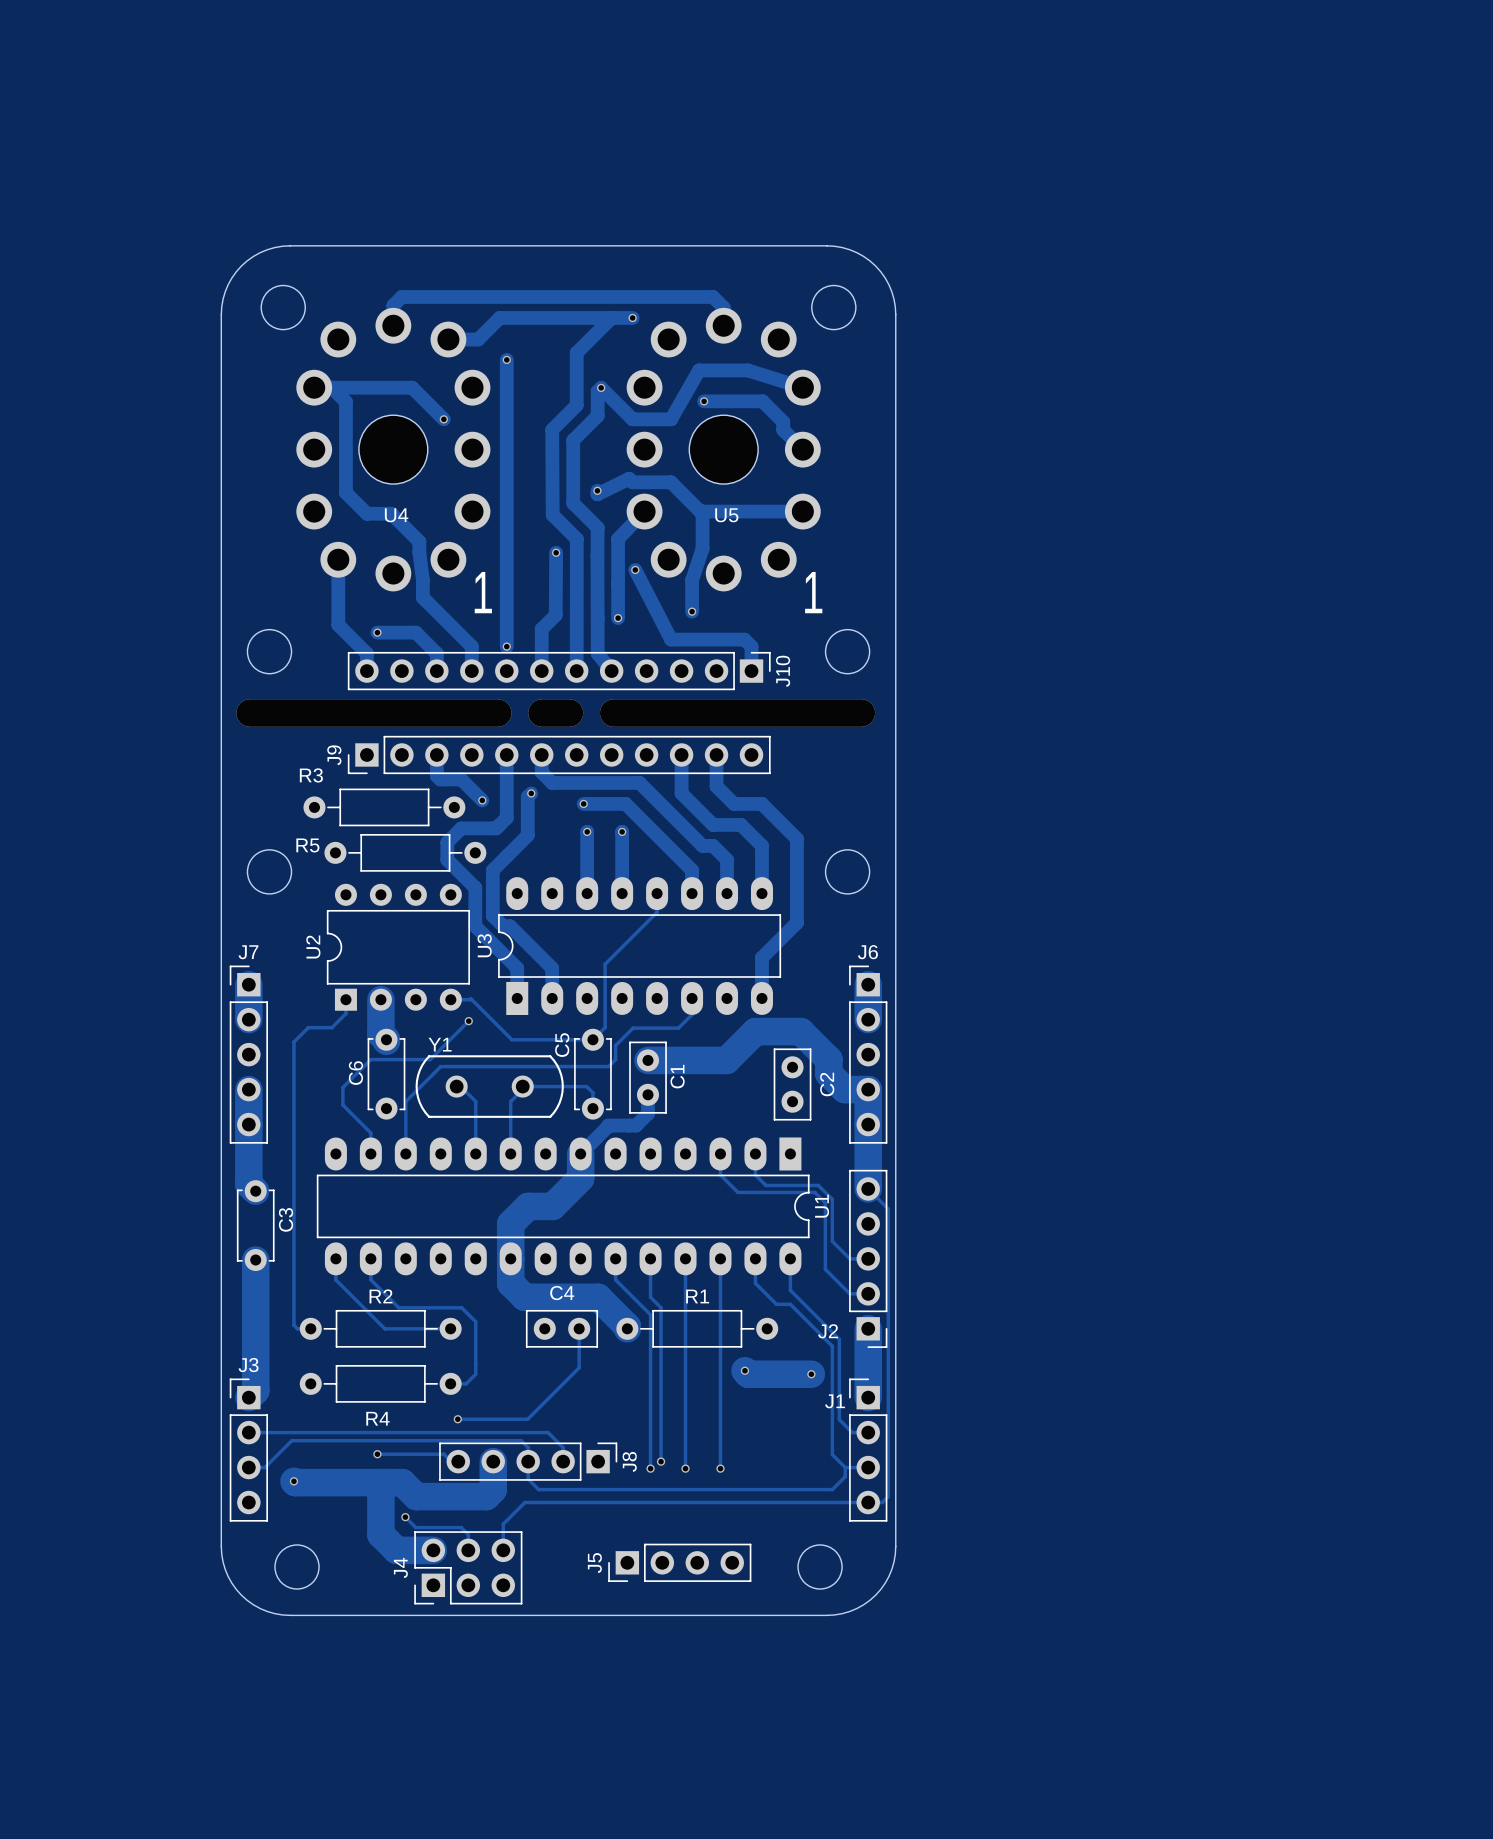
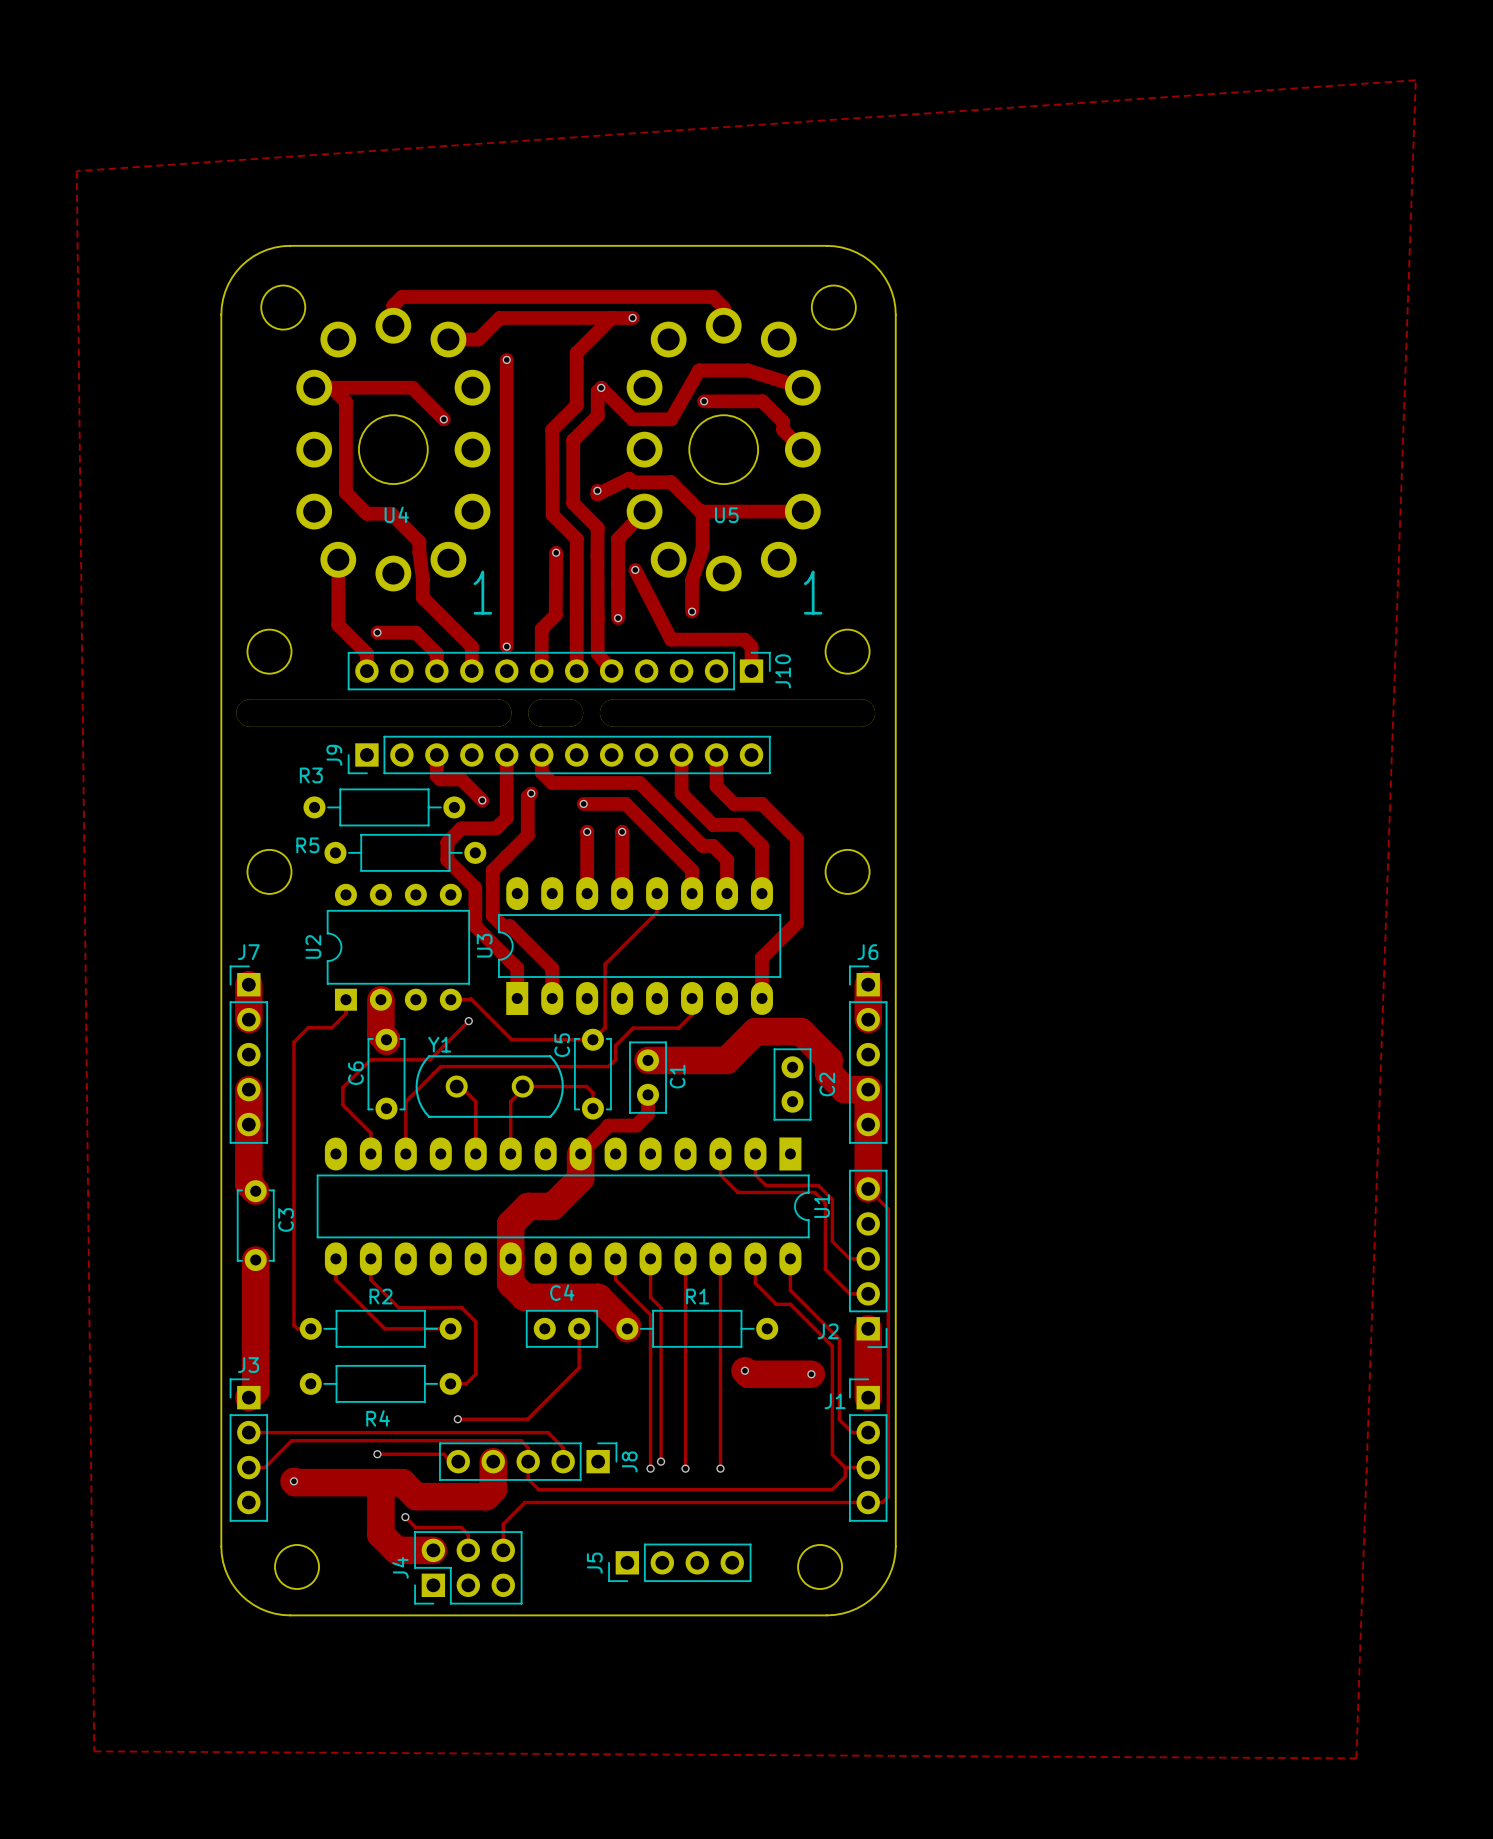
zone outline: none -> (1415, 80) (1356, 1758) (94, 1751) (76, 171) (1415, 80)

